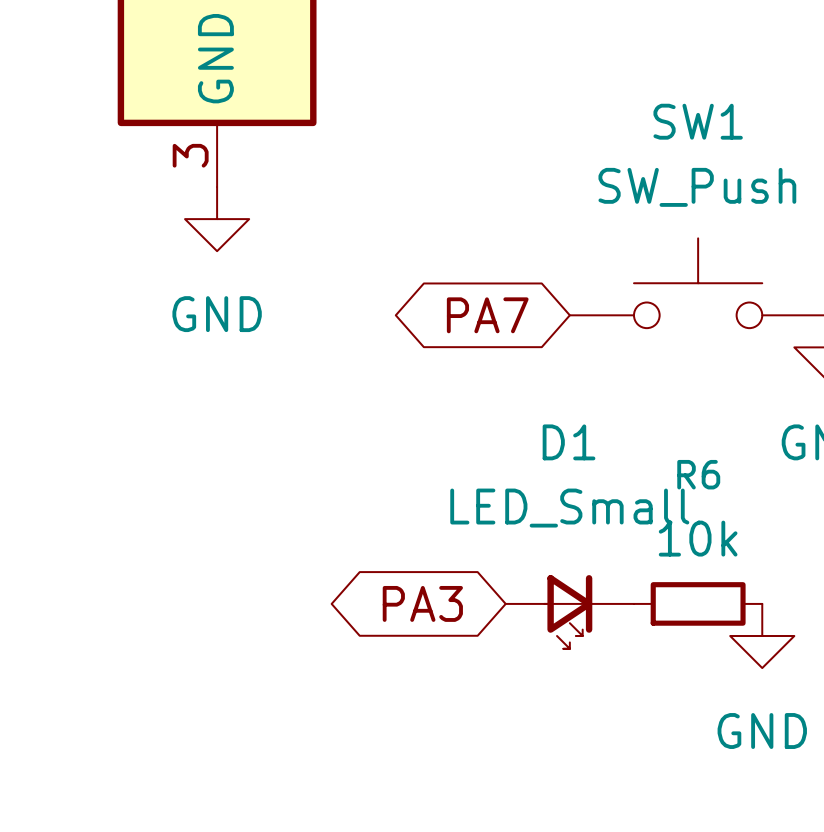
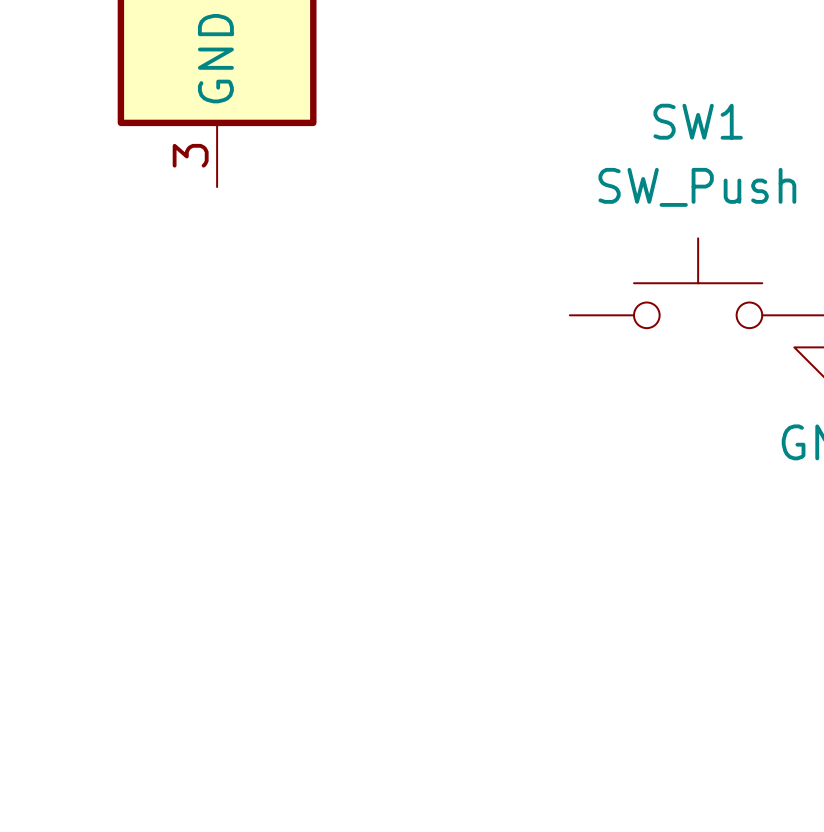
power symbol: GND (217, 219) -> none
global label: PA7 (487, 315) -> none
global label: PA3 (422, 603) -> none
R6: 10k (698, 603) -> none
D1: LED_Small (569, 611) -> none
power symbol: GND (762, 636) -> none

